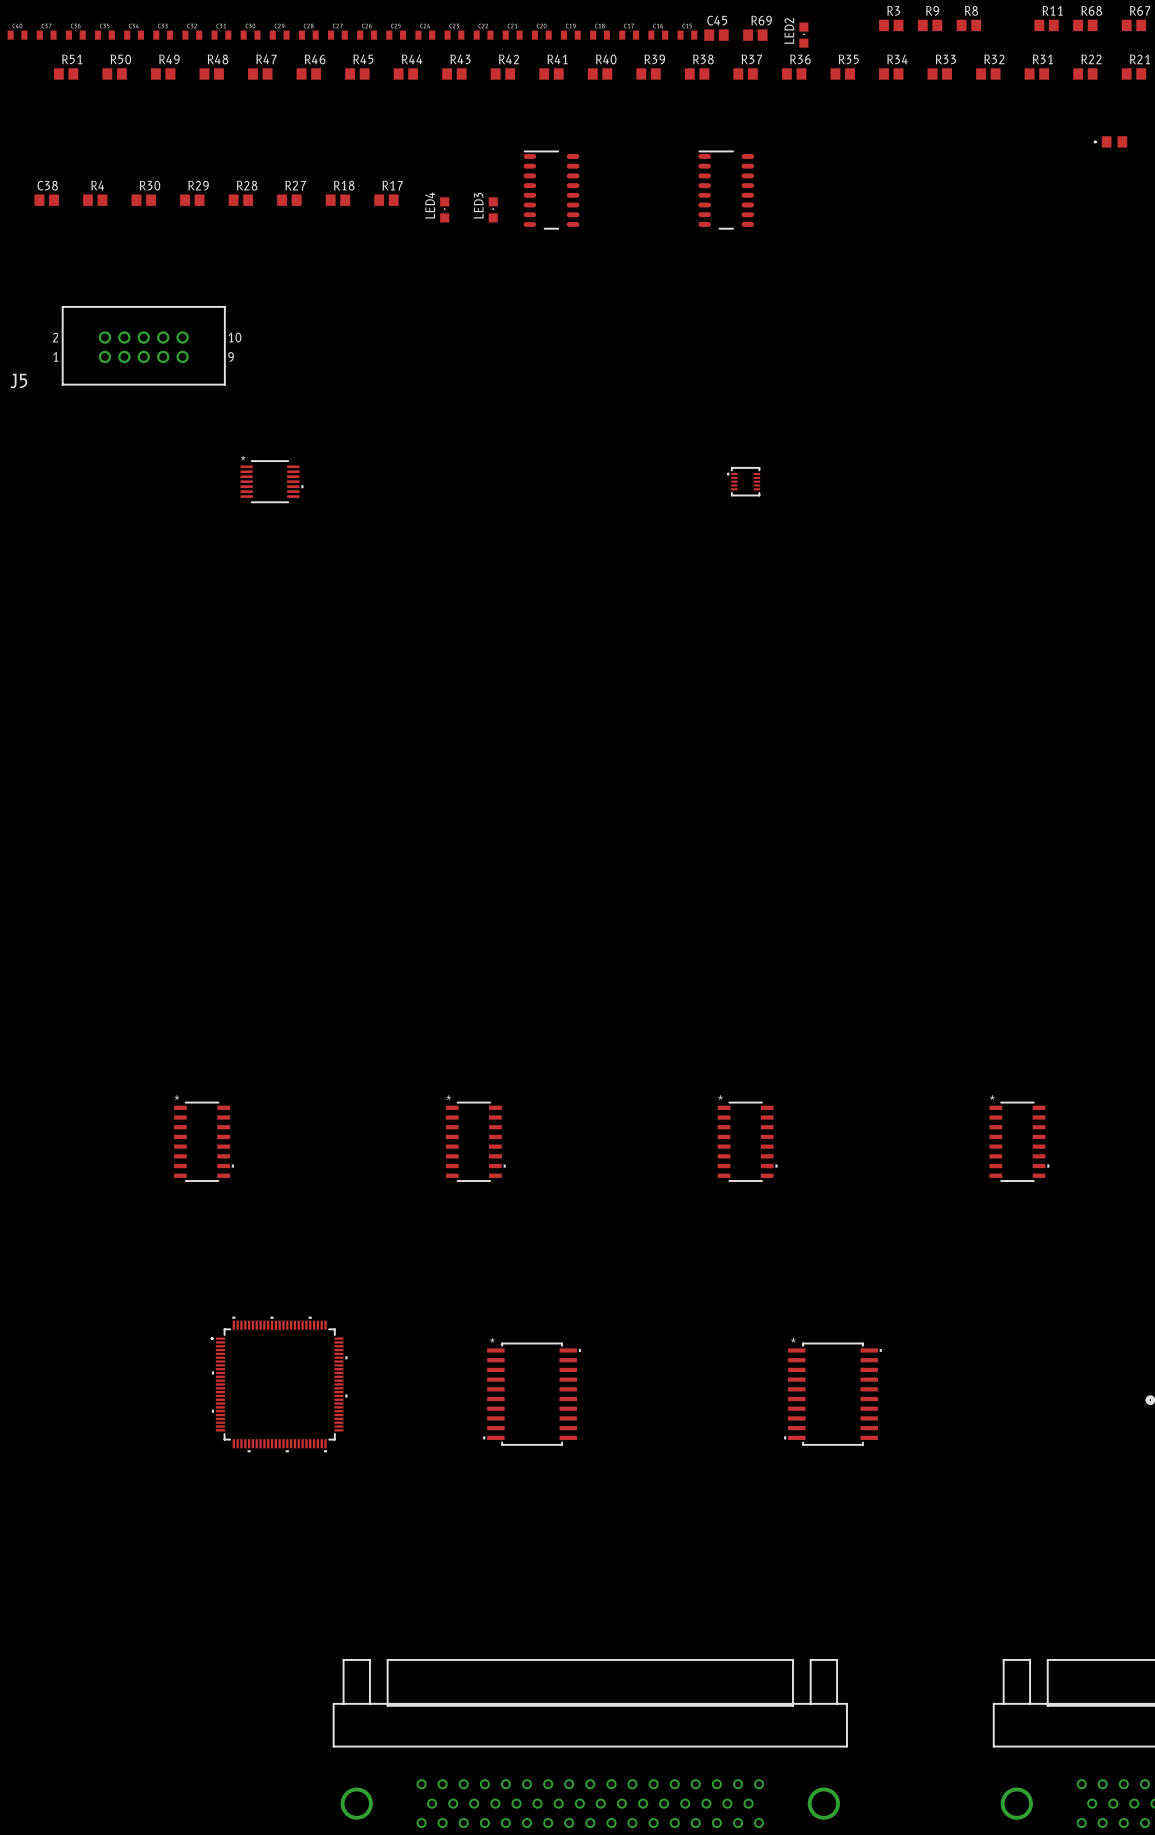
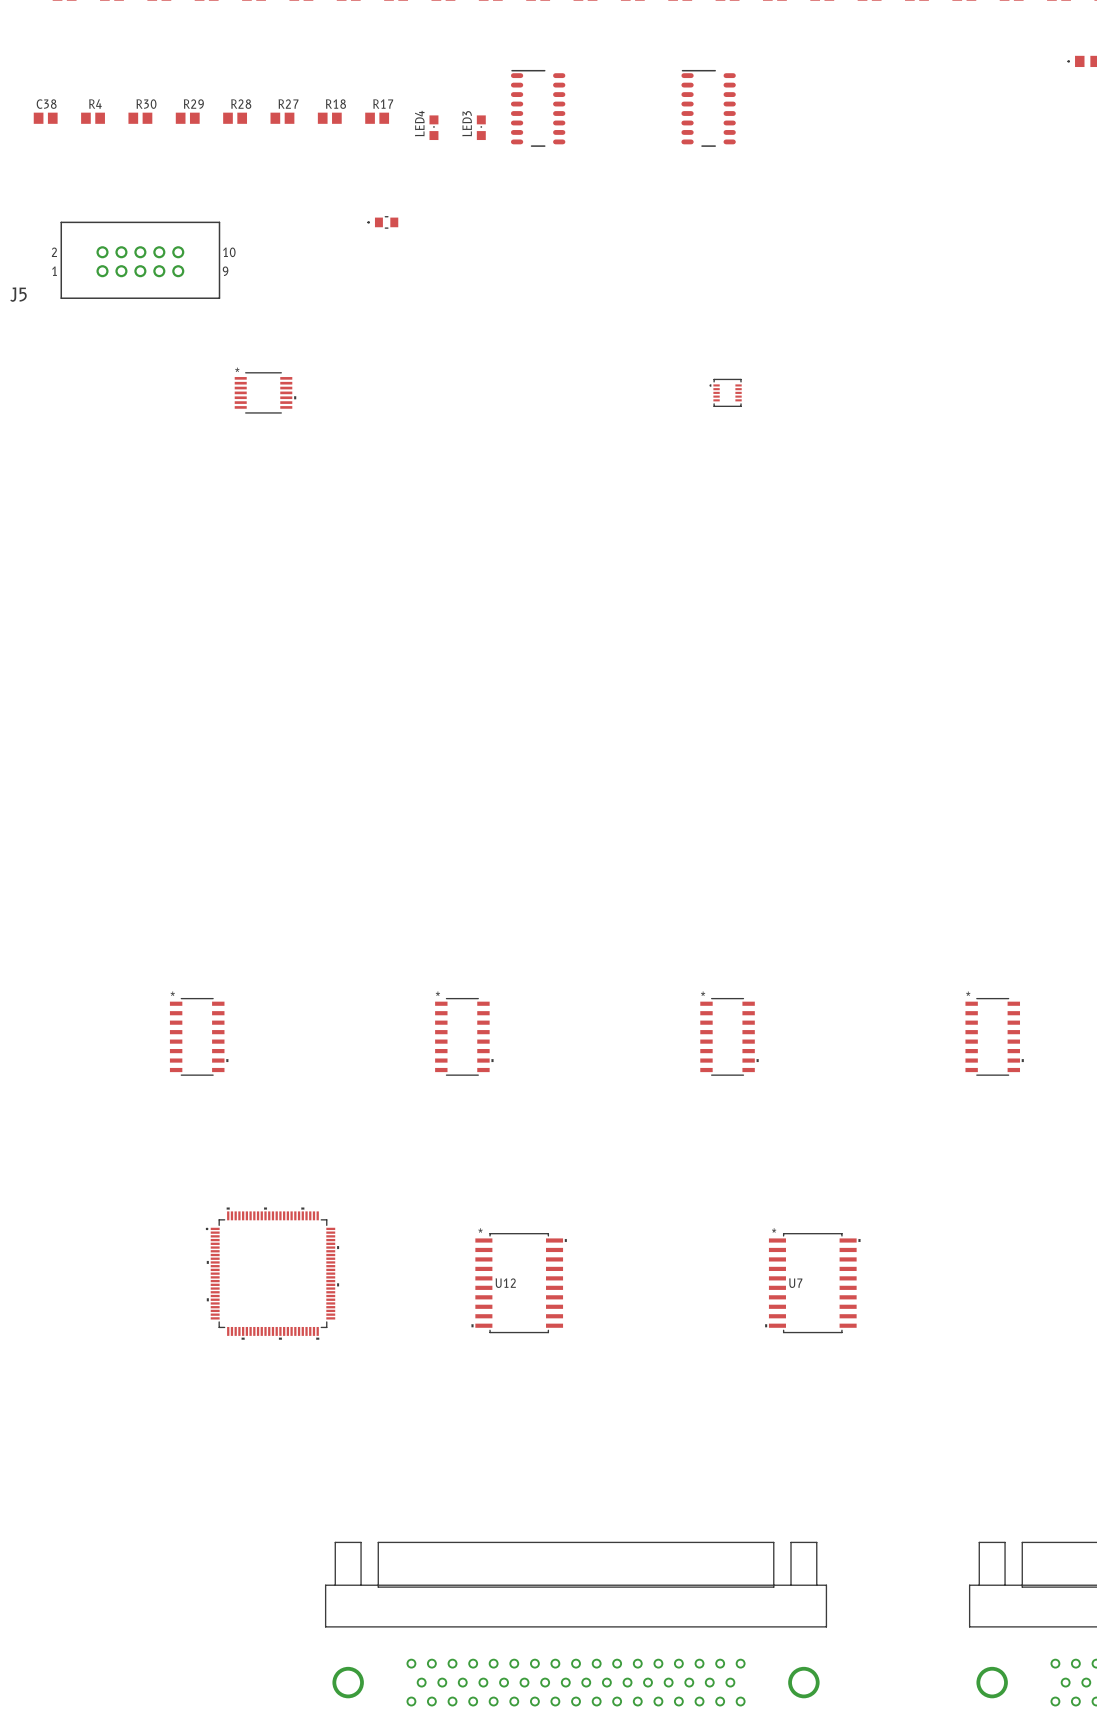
part: none -> (382, 222)
U12 name: none -> U12 (505, 1283)
U7 name: none -> U7 (795, 1283)

